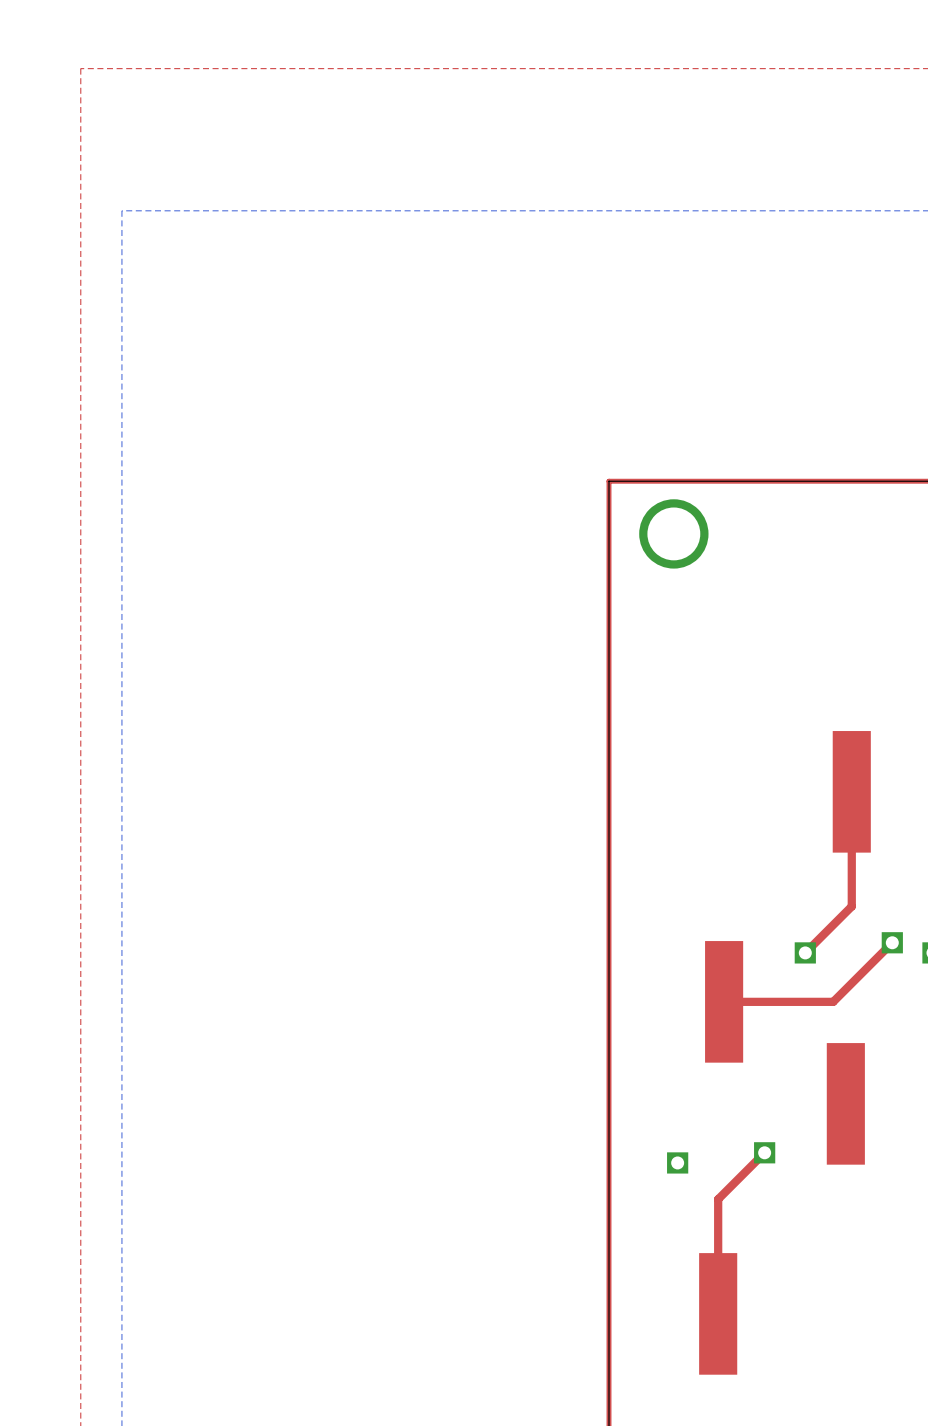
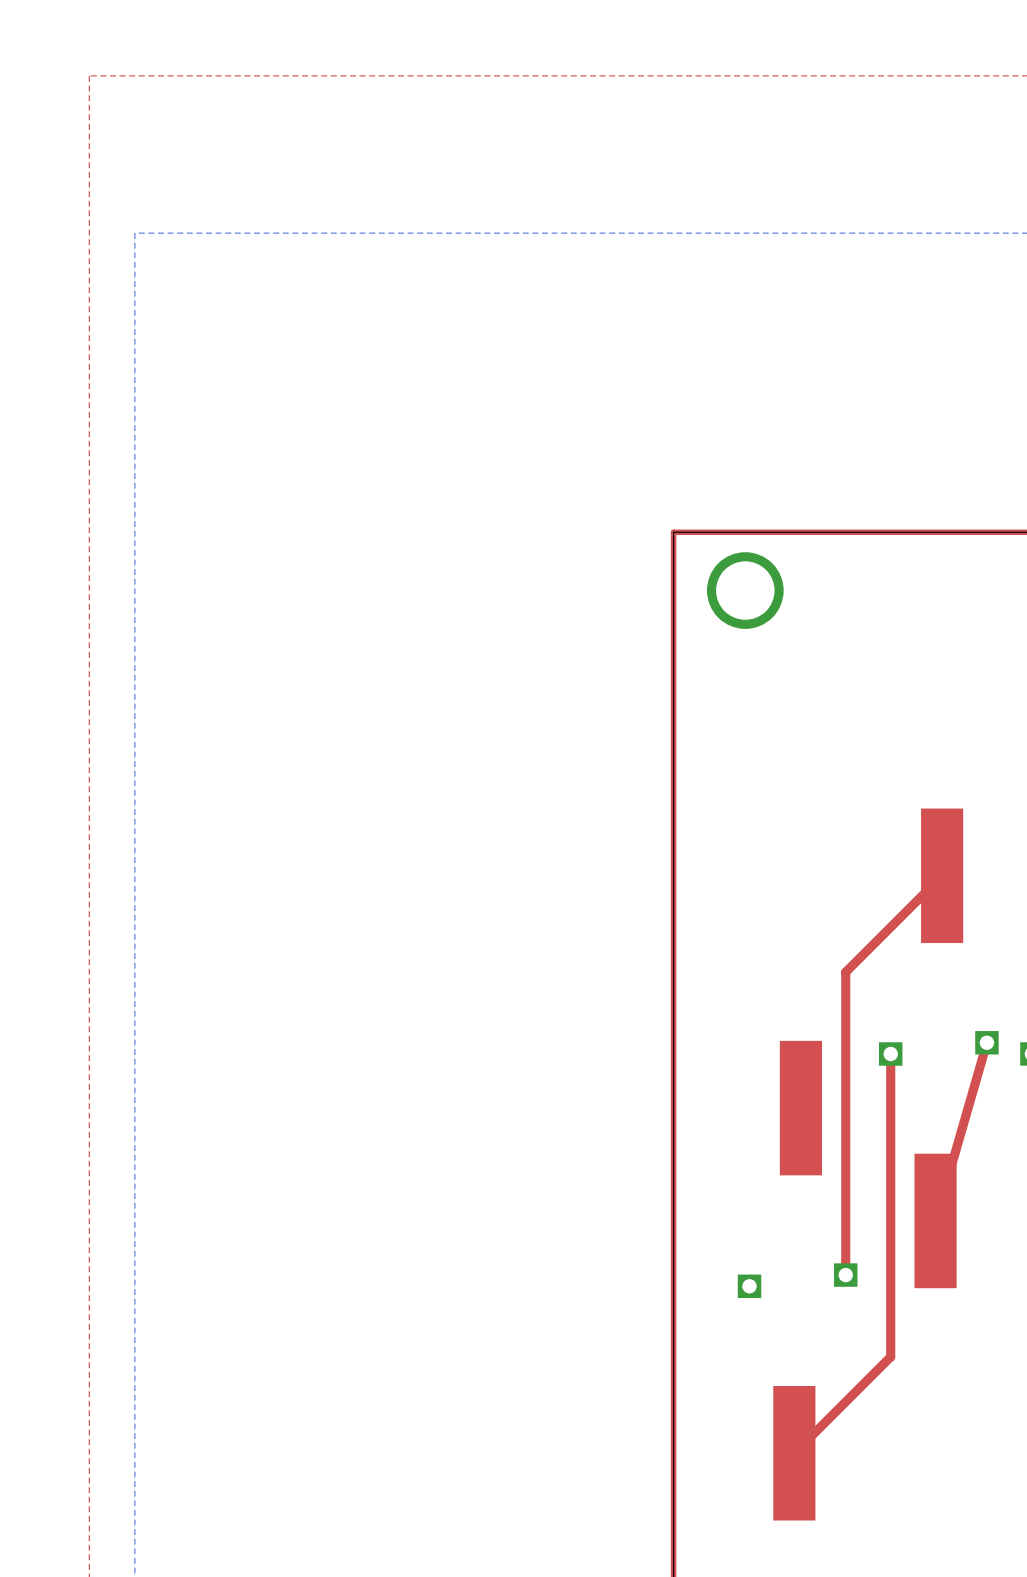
top track: (851, 791) (851, 906) (805, 952) -> (942, 875) (845, 972) (845, 1275)
top track: (892, 942) (833, 1001) (724, 1001) -> (986, 1042) (935, 1220)
top track: (764, 1152) (718, 1199) (718, 1313) -> (890, 1053) (890, 1356) (794, 1453)

